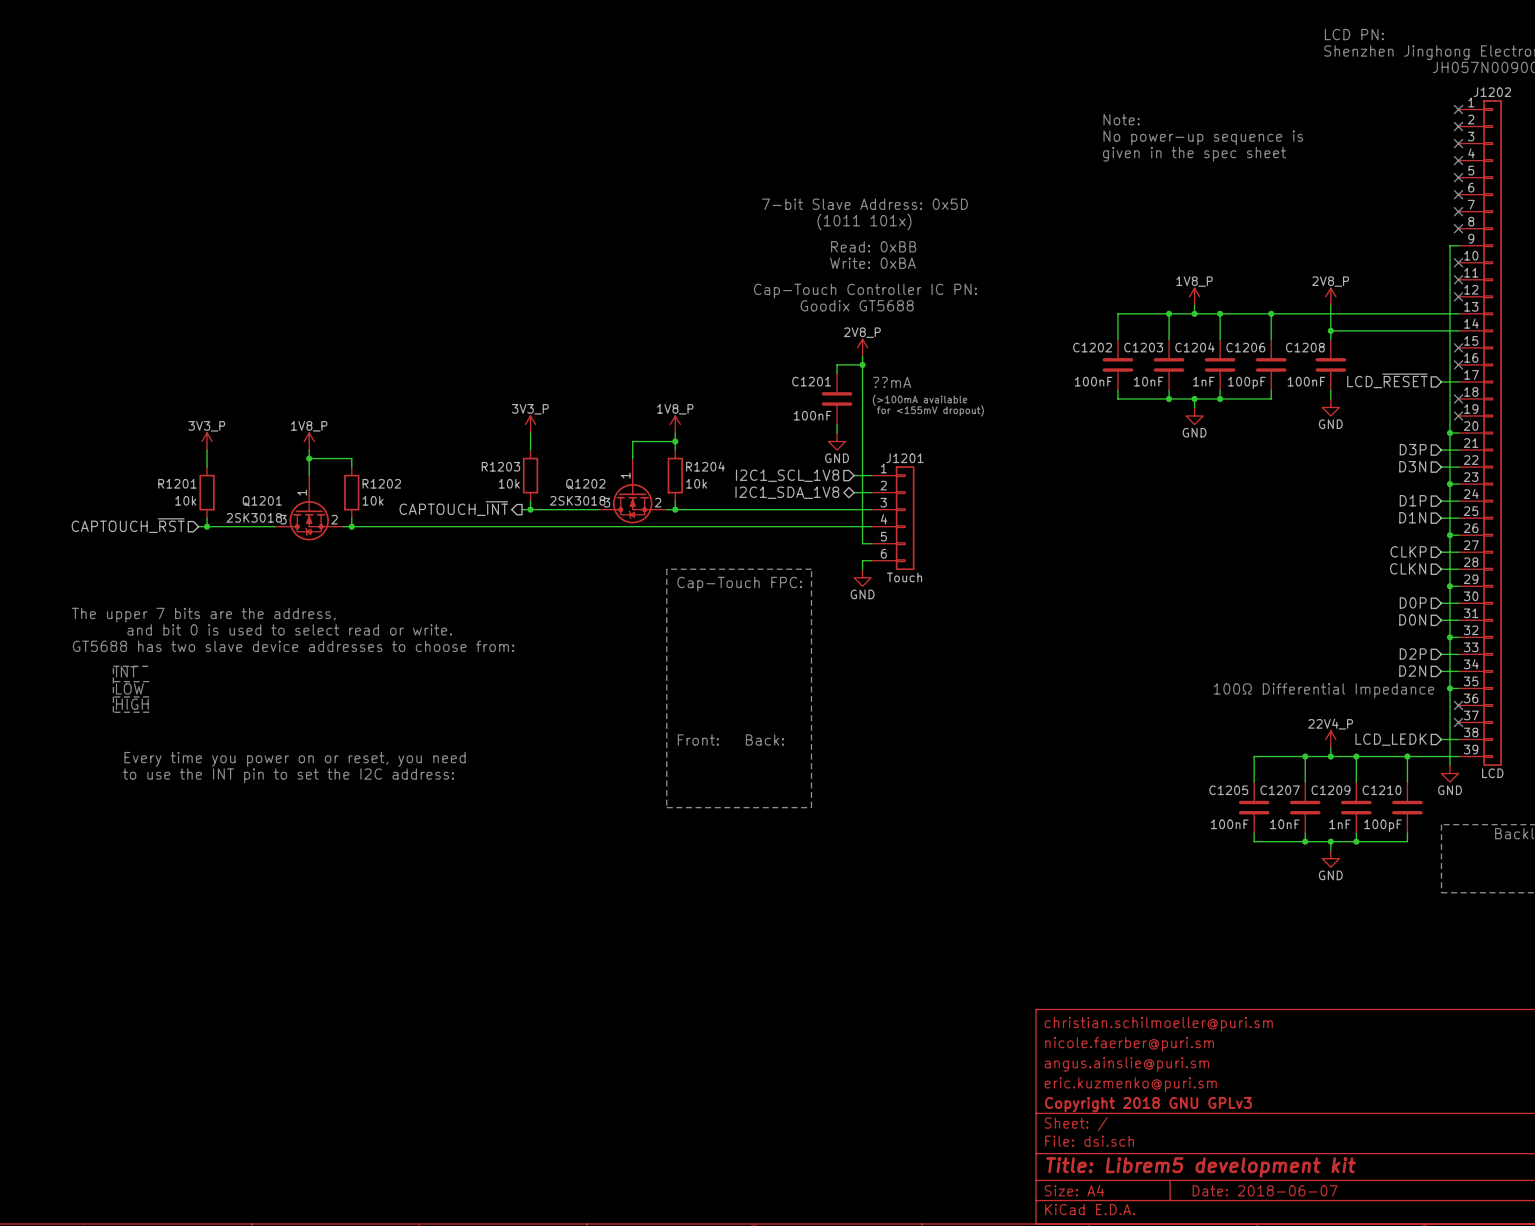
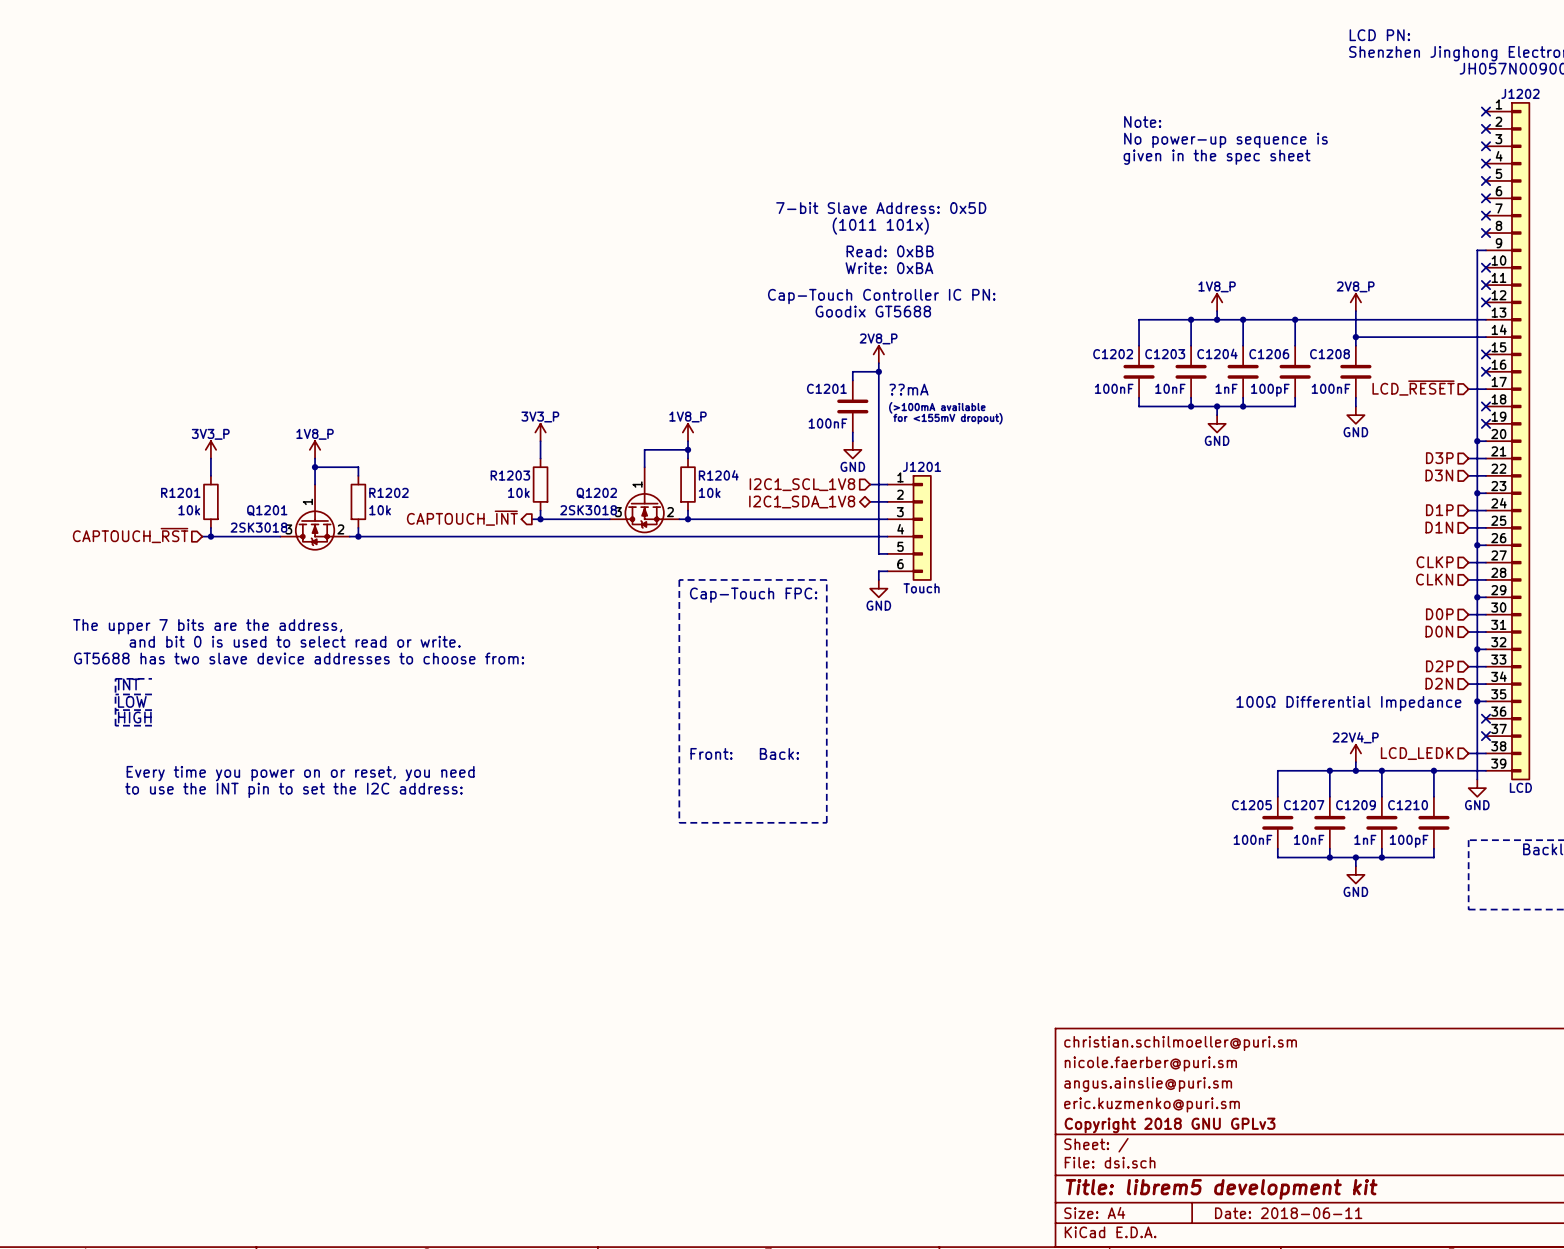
title block: Title: Librem5 development kit (1201, 1167) -> Title: librem5 development kit (1221, 1189)
title block: Date: 2018-06-07 (1265, 1190) -> Date: 2018-06-11 (1288, 1213)

